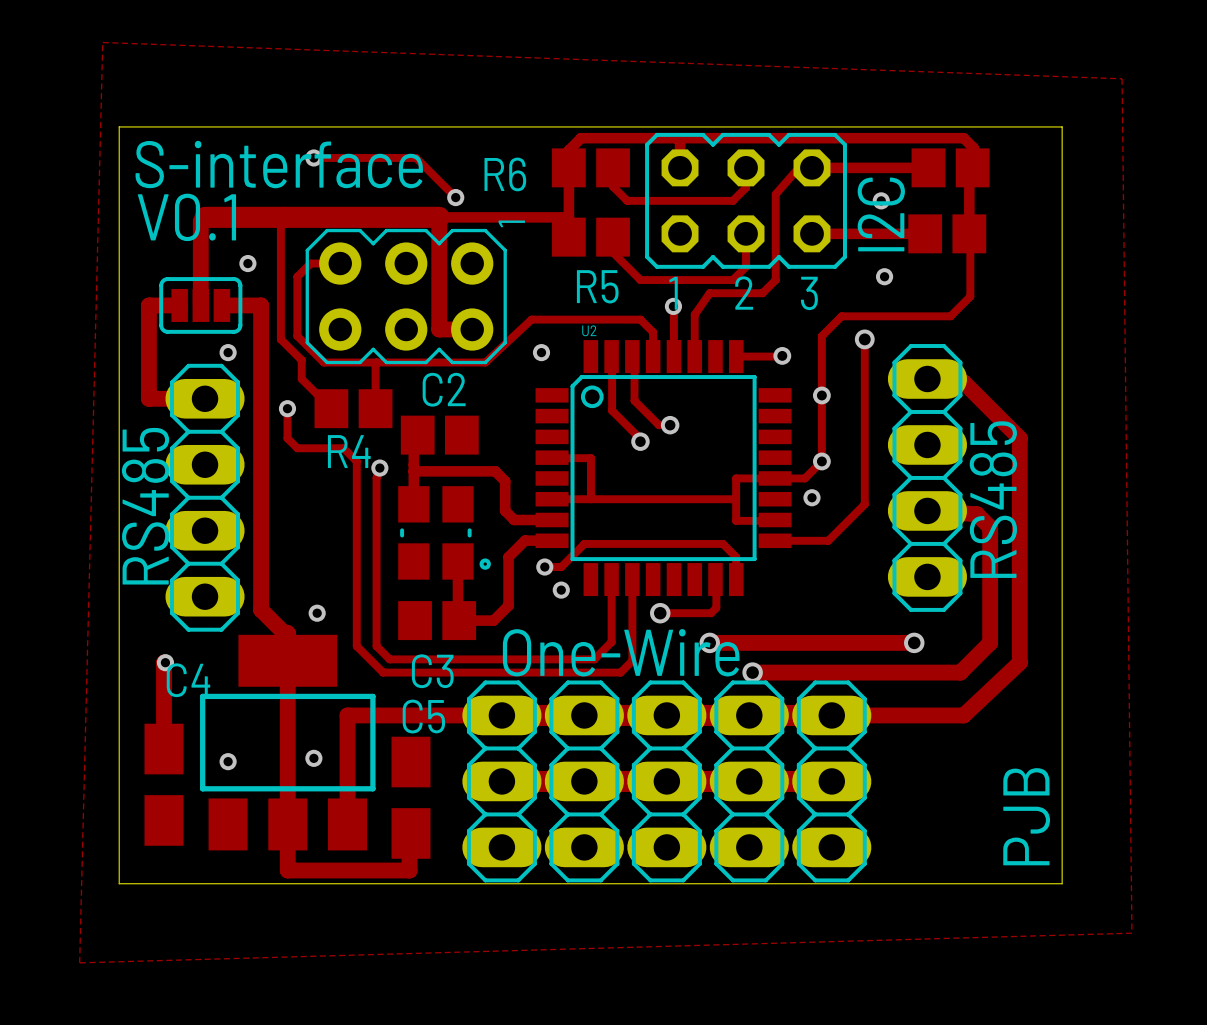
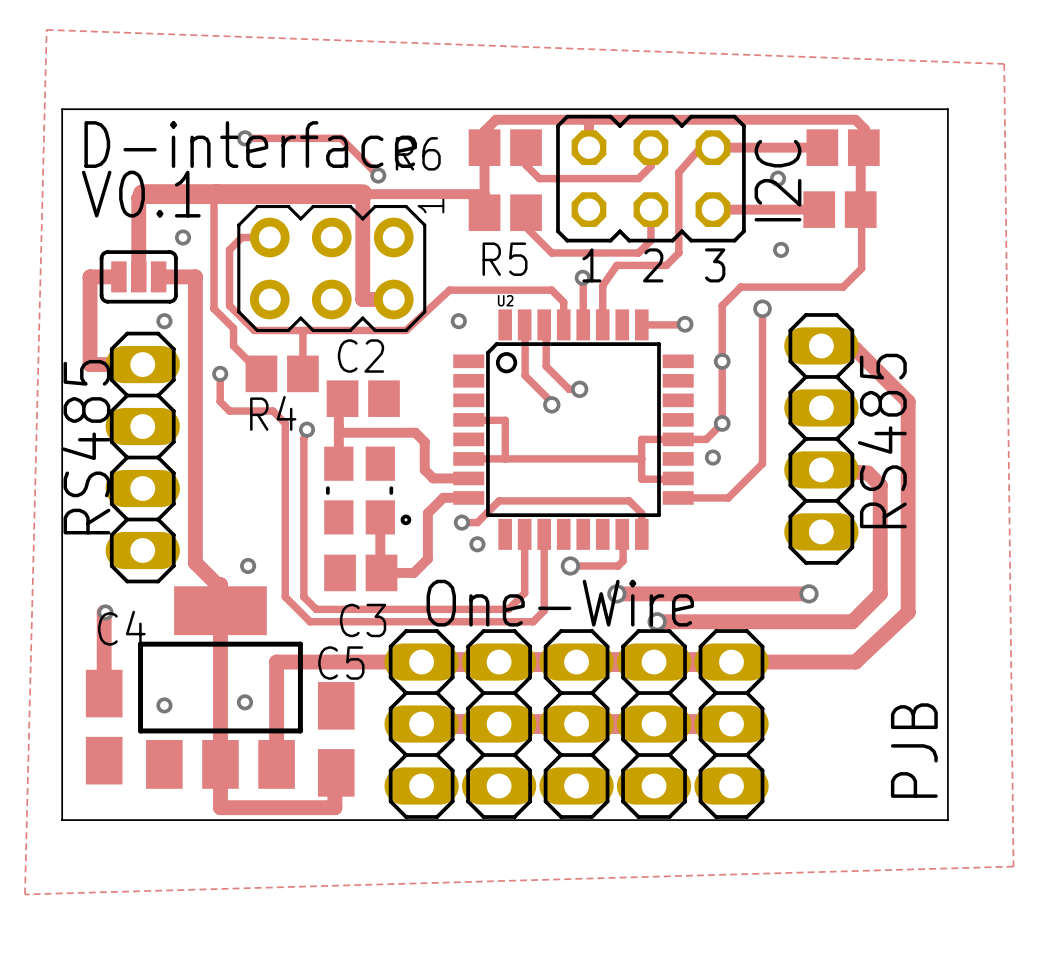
text: S-interface (279, 164) -> D-interface (250, 144)

